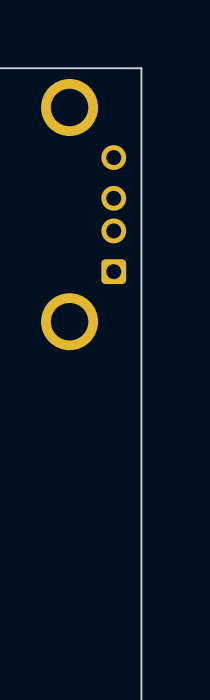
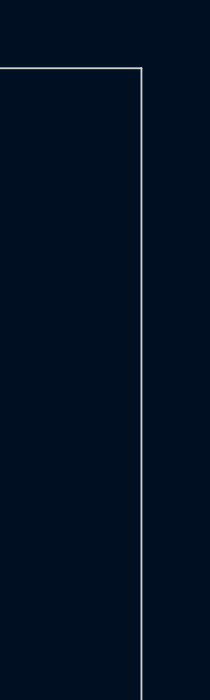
part: (83, 214) -> none

